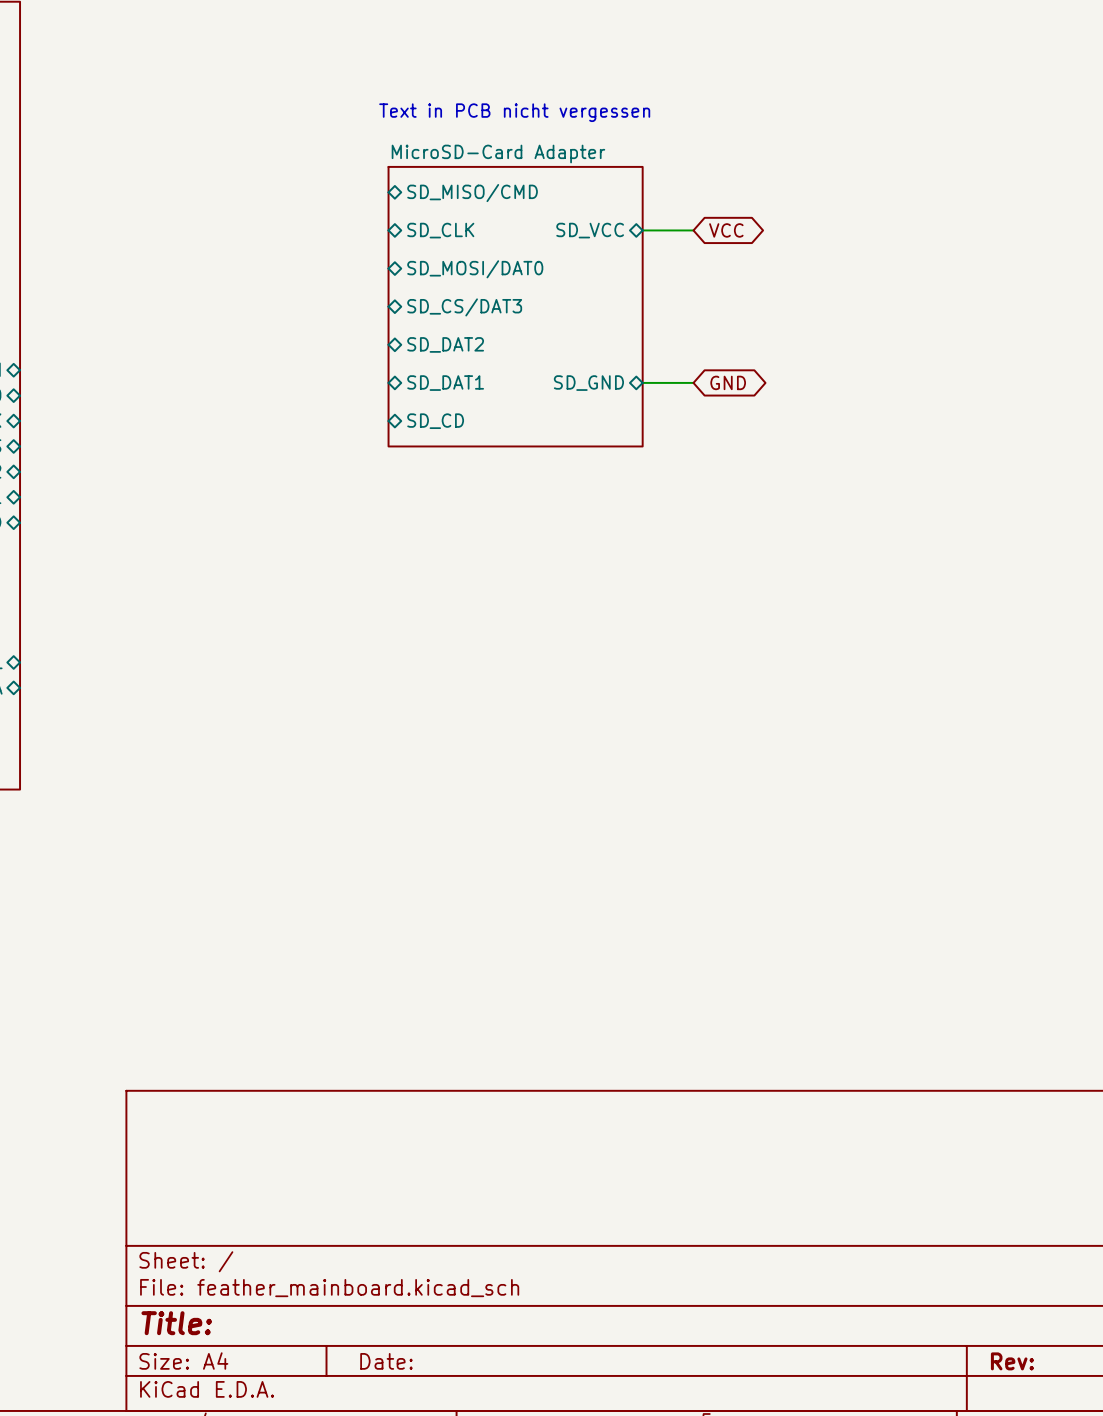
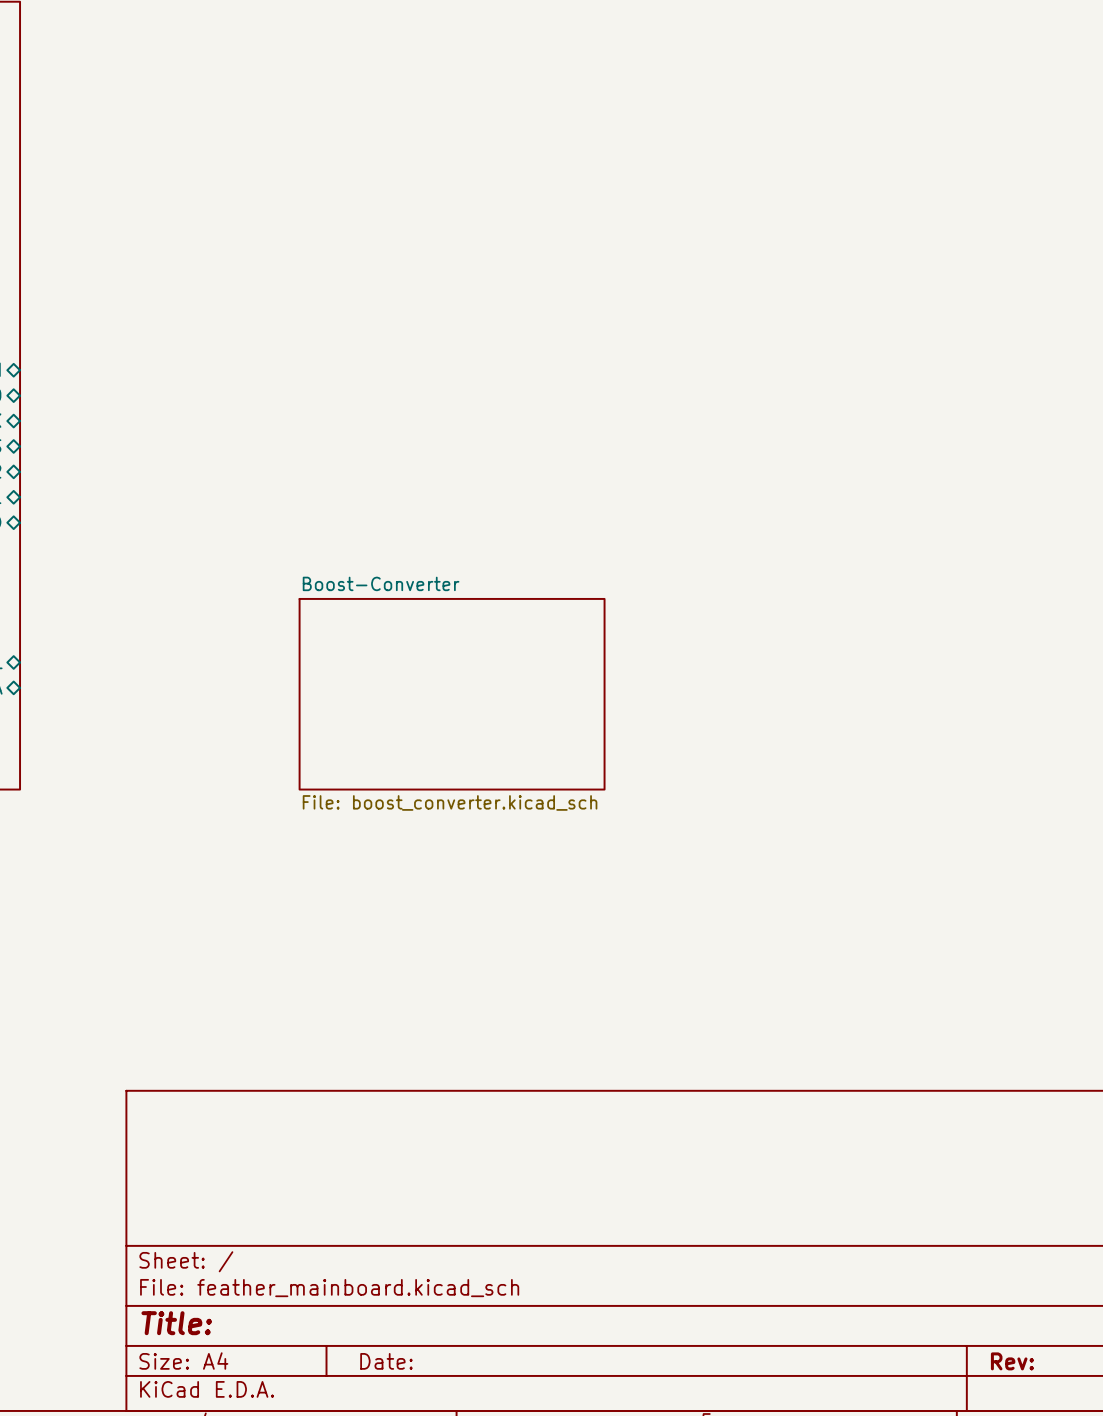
text: Text in PCB nicht vergessen (514, 112) -> none
sheet pin: SD_MISO/CMD (472, 193) -> none
sheet pin: SD_CLK (440, 230) -> none
sheet pin: SD_VCC (590, 230) -> none
wire: (642, 230) (693, 230) -> none
global label: VCC (726, 230) -> none
sheet pin: SD_MOSI/DAT0 (475, 269) -> none
sheet MicroSD-Card Adapter: (515, 306) -> none
sheet pin: SD_CS/DAT3 (464, 307) -> none
sheet pin: SD_DAT2 (445, 344) -> none
wire: (642, 382) (693, 382) -> none
global label: GND (728, 382) -> none
sheet pin: SD_DAT1 (445, 383) -> none
sheet pin: SD_GND (588, 383) -> none
sheet pin: SD_CD (435, 421) -> none
sheet Boost-Converter: none -> File: boost_converter.kicad_sch (452, 694)

